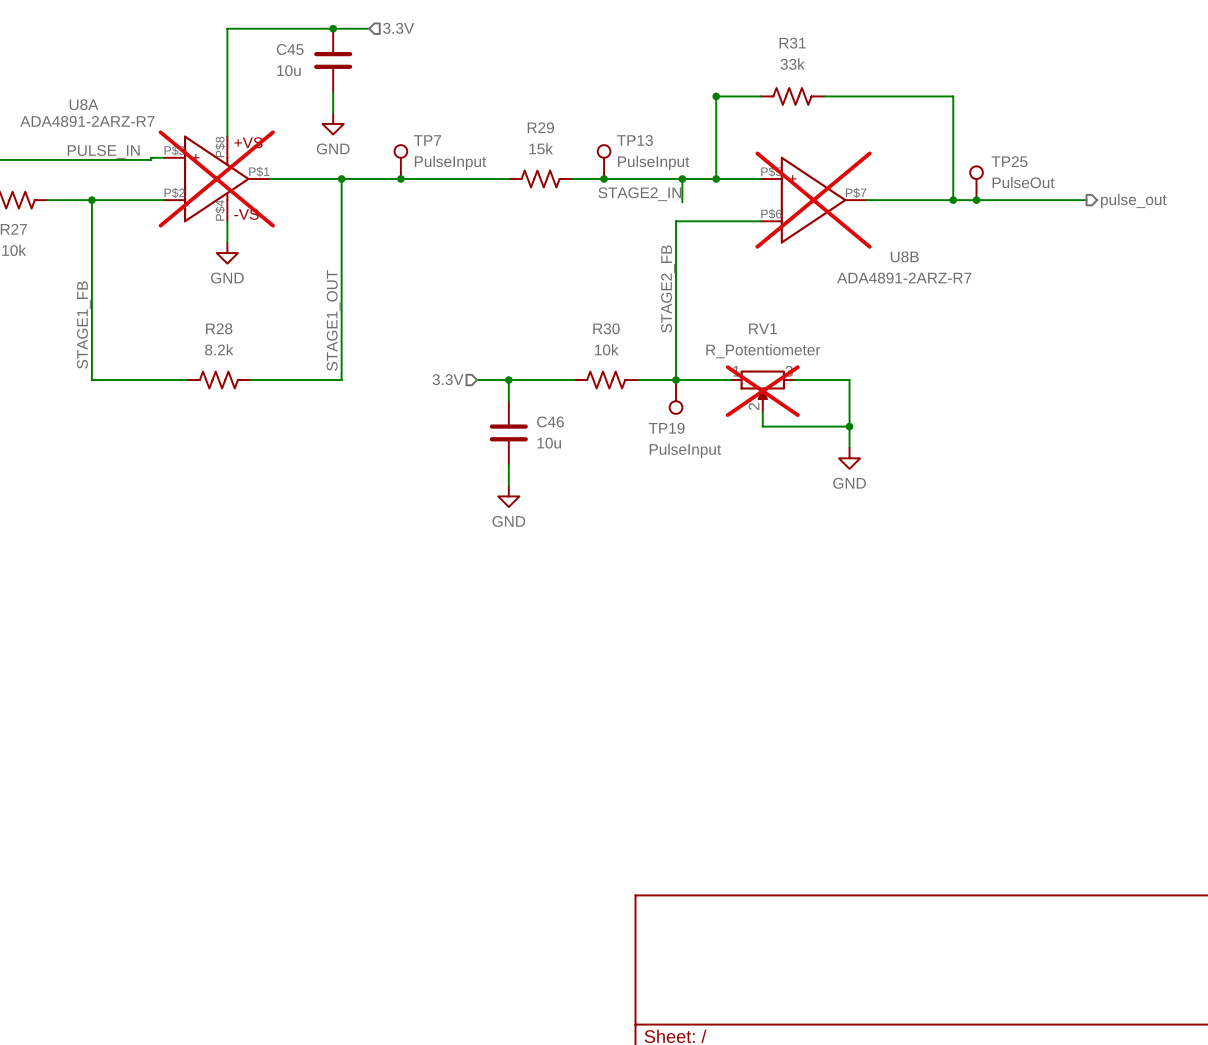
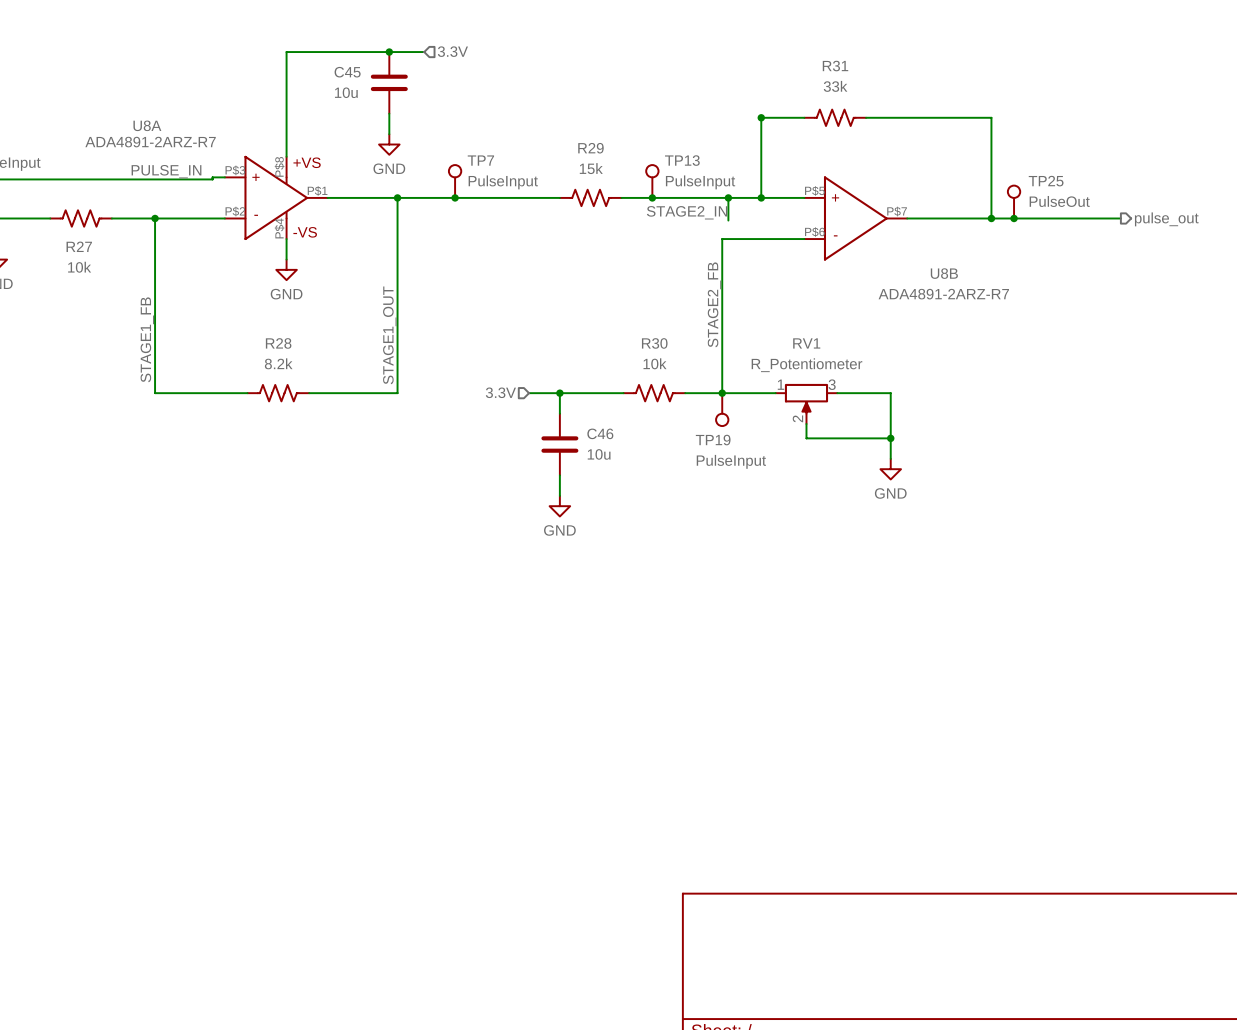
U8A do-not-place cross: (216, 178) -> none
U8B do-not-place cross: (813, 200) -> none
RV1 do-not-place cross: (762, 391) -> none

